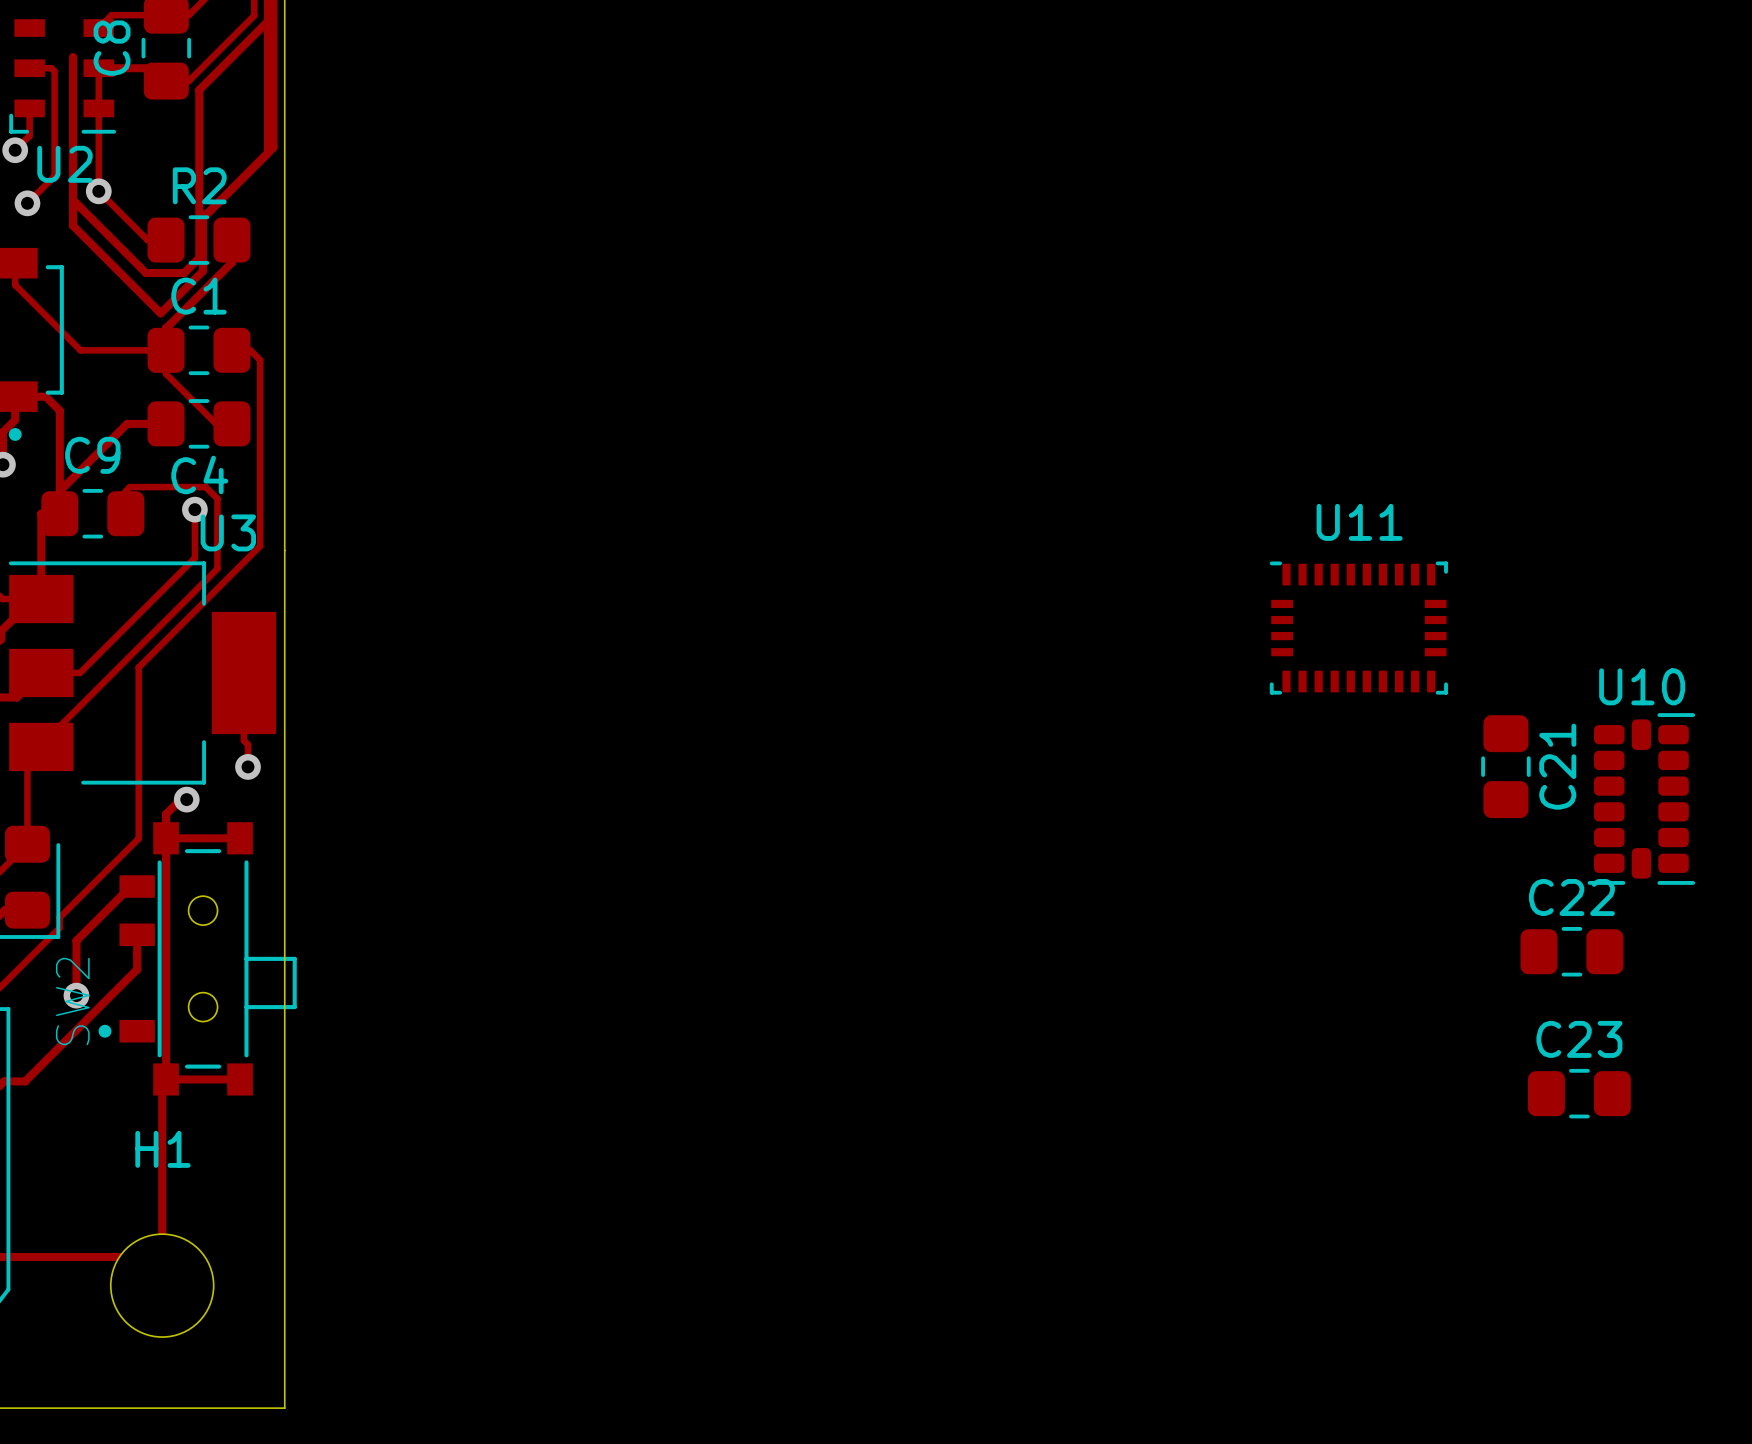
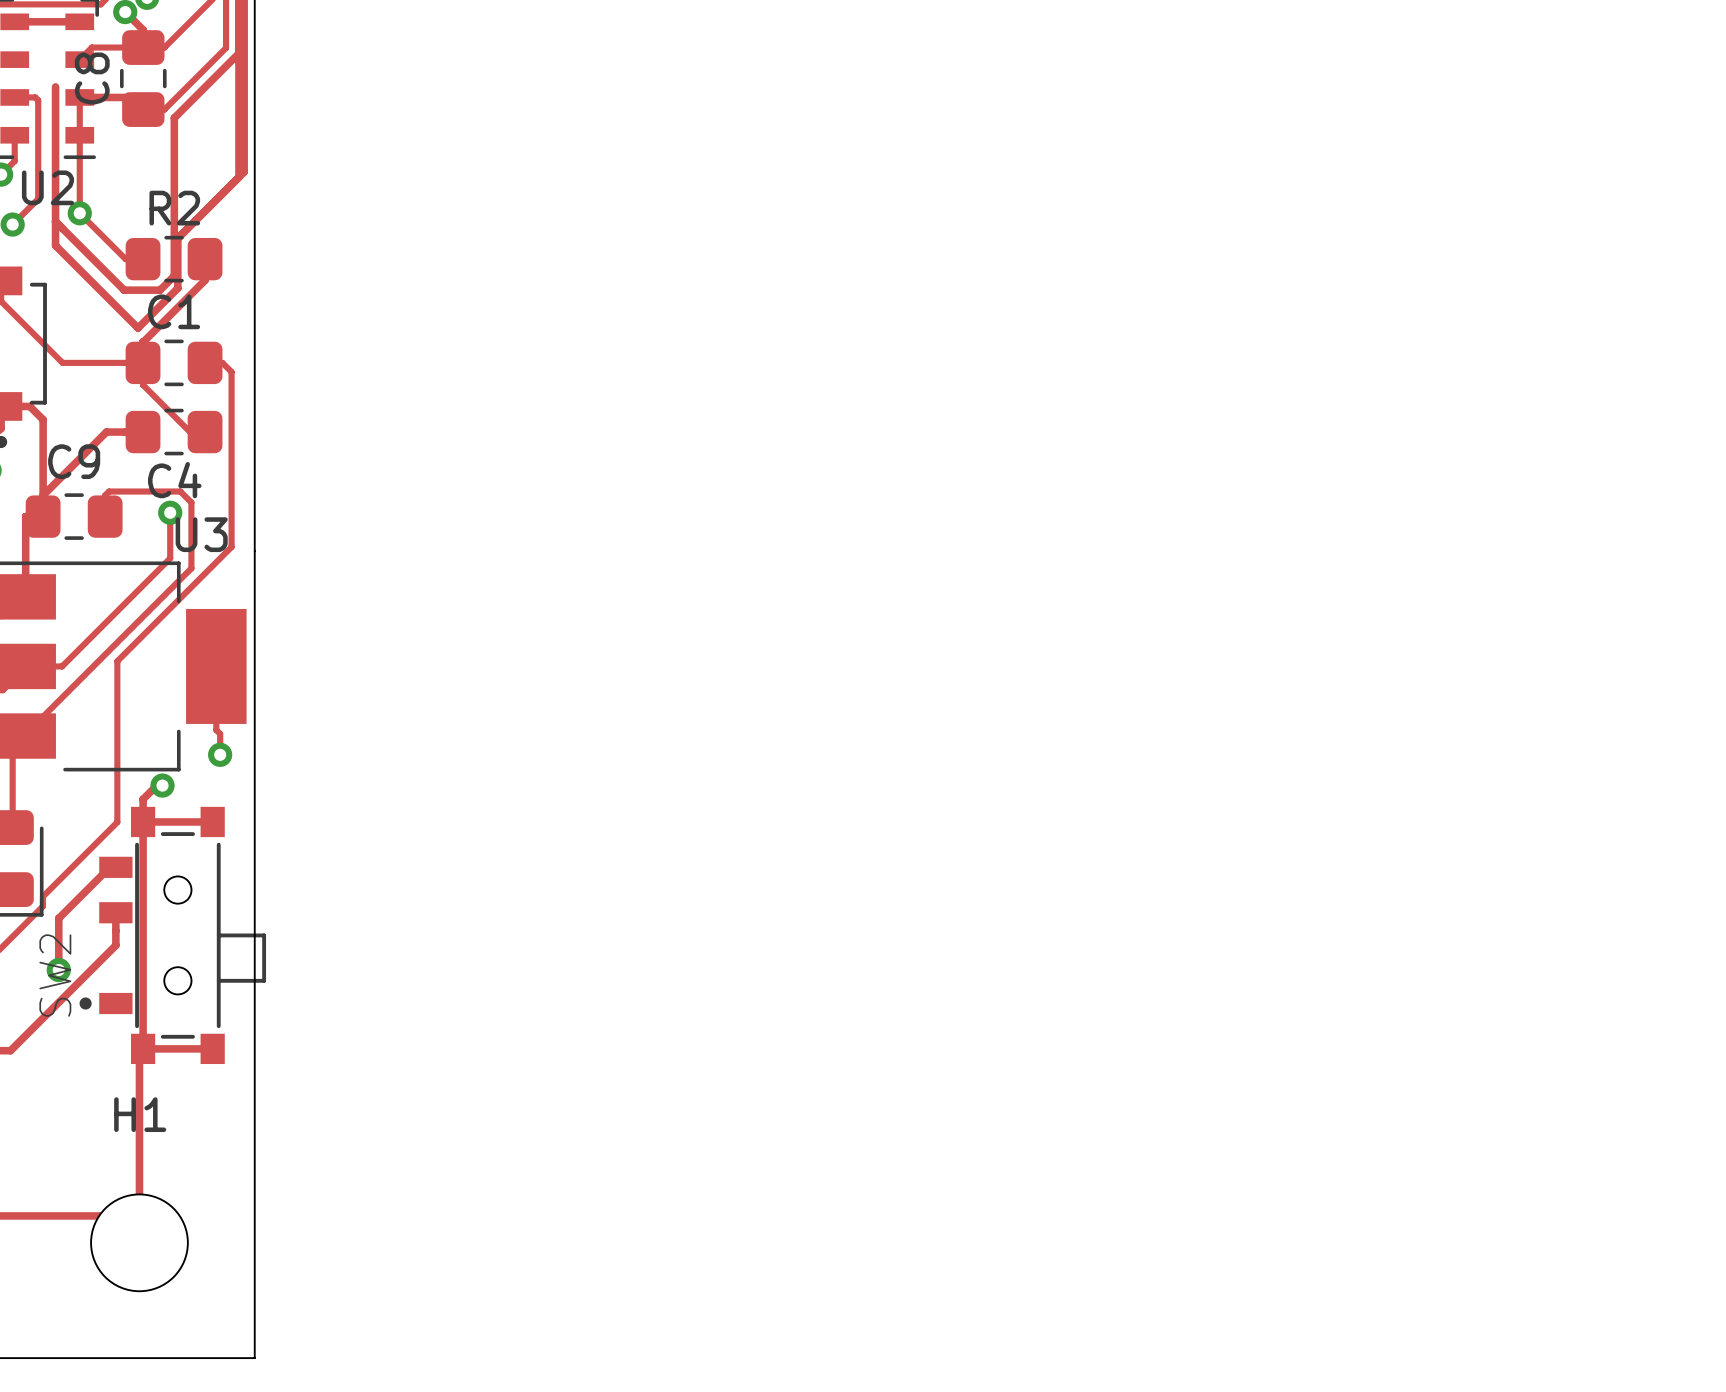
U11: (1358, 628) -> none
C21: (1505, 766) -> none
U10: (1641, 798) -> none
C22: (1571, 951) -> none
C23: (1579, 1093) -> none

